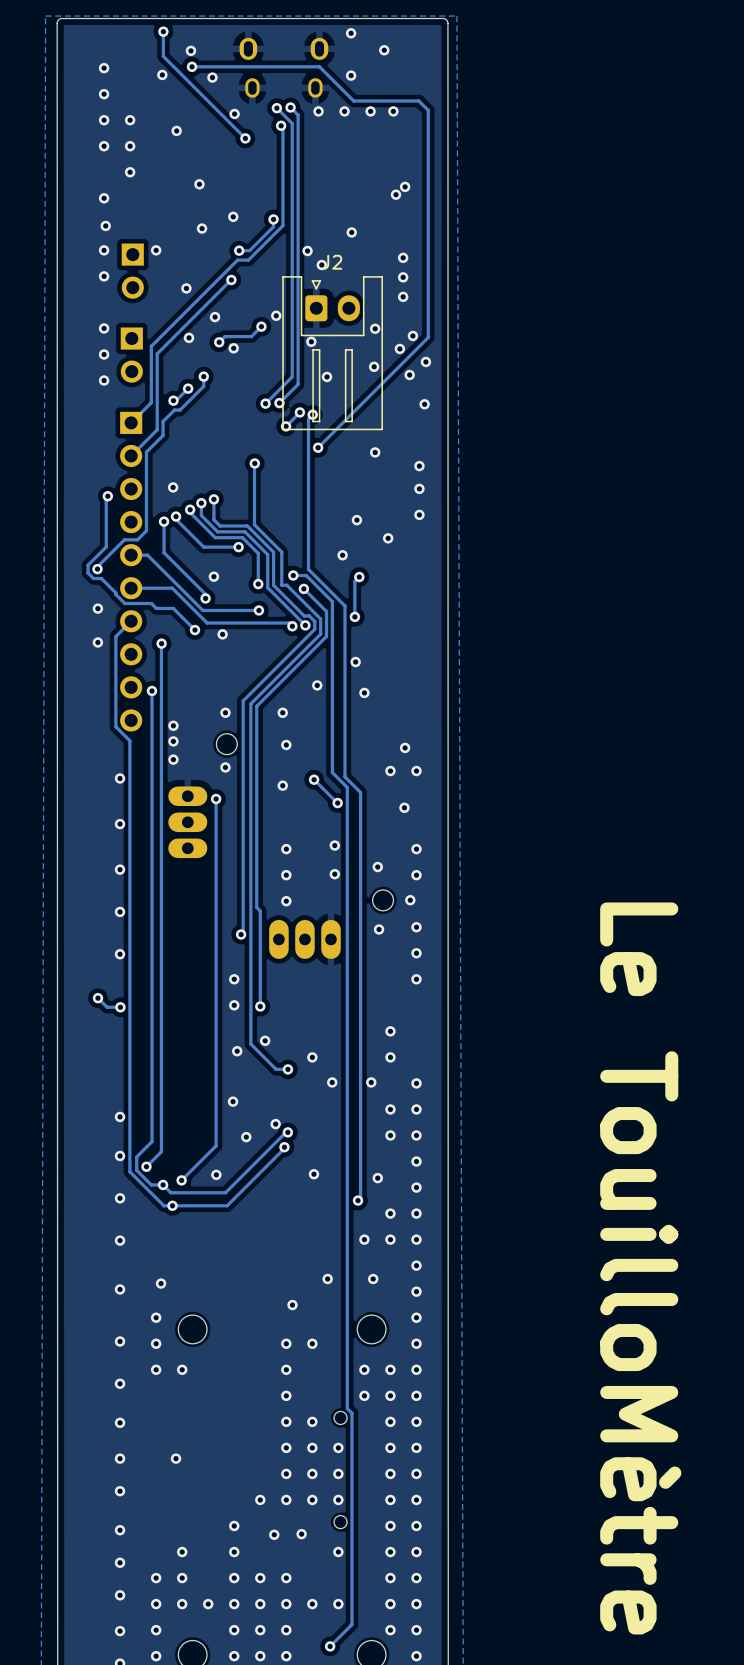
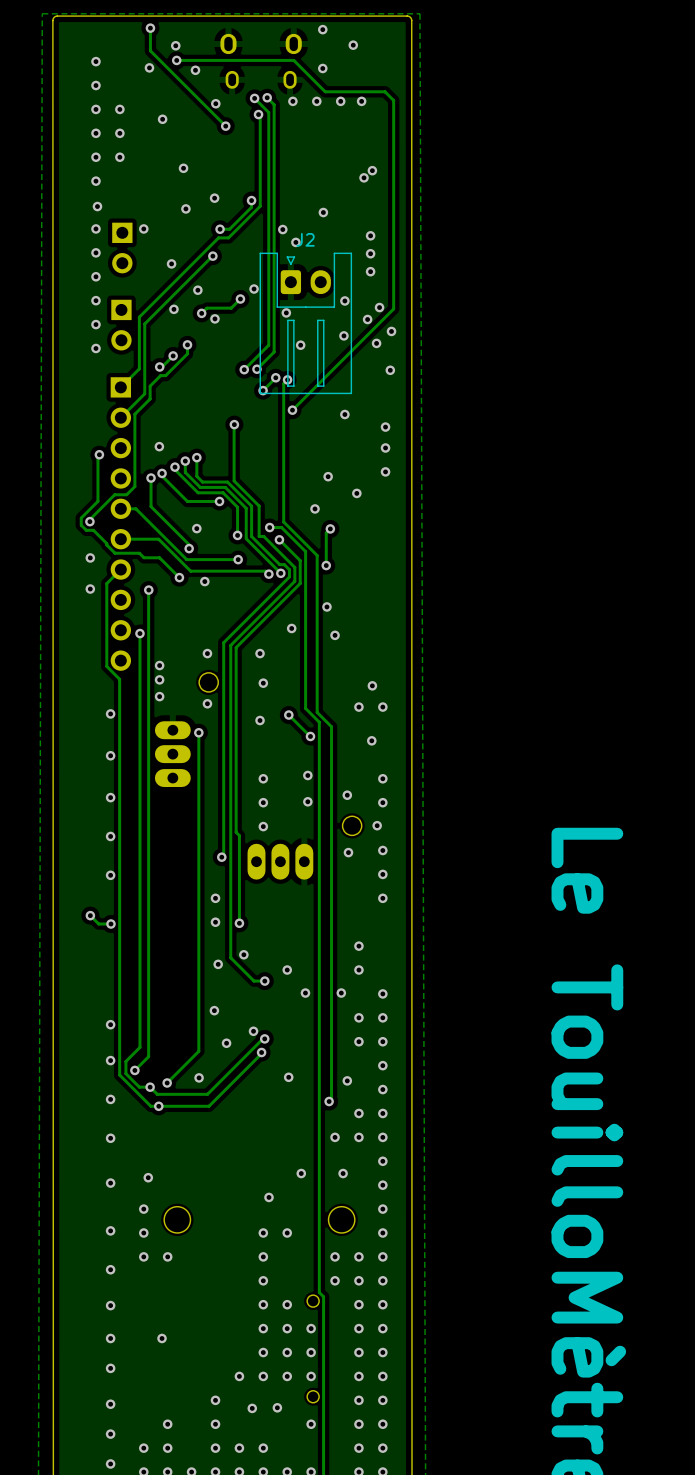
via: none -> (95, 157)
via: none -> (95, 276)

